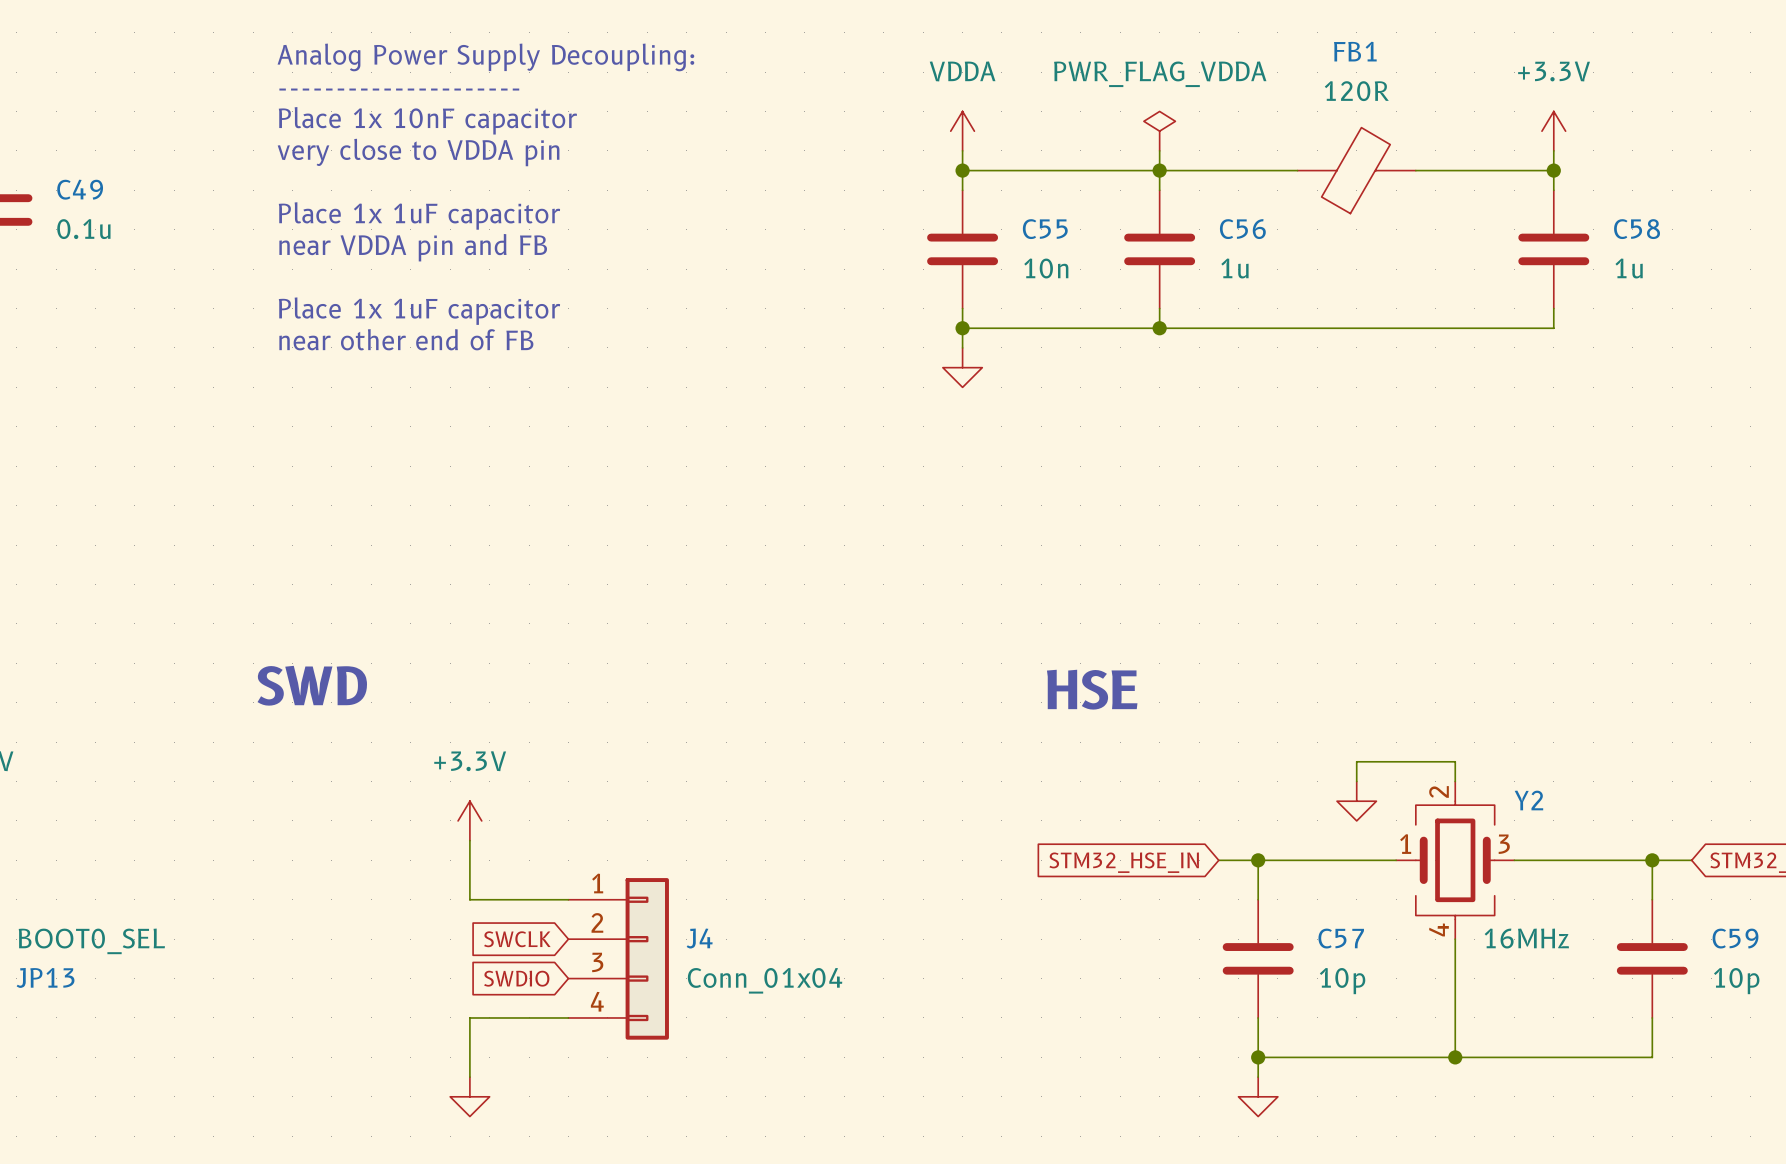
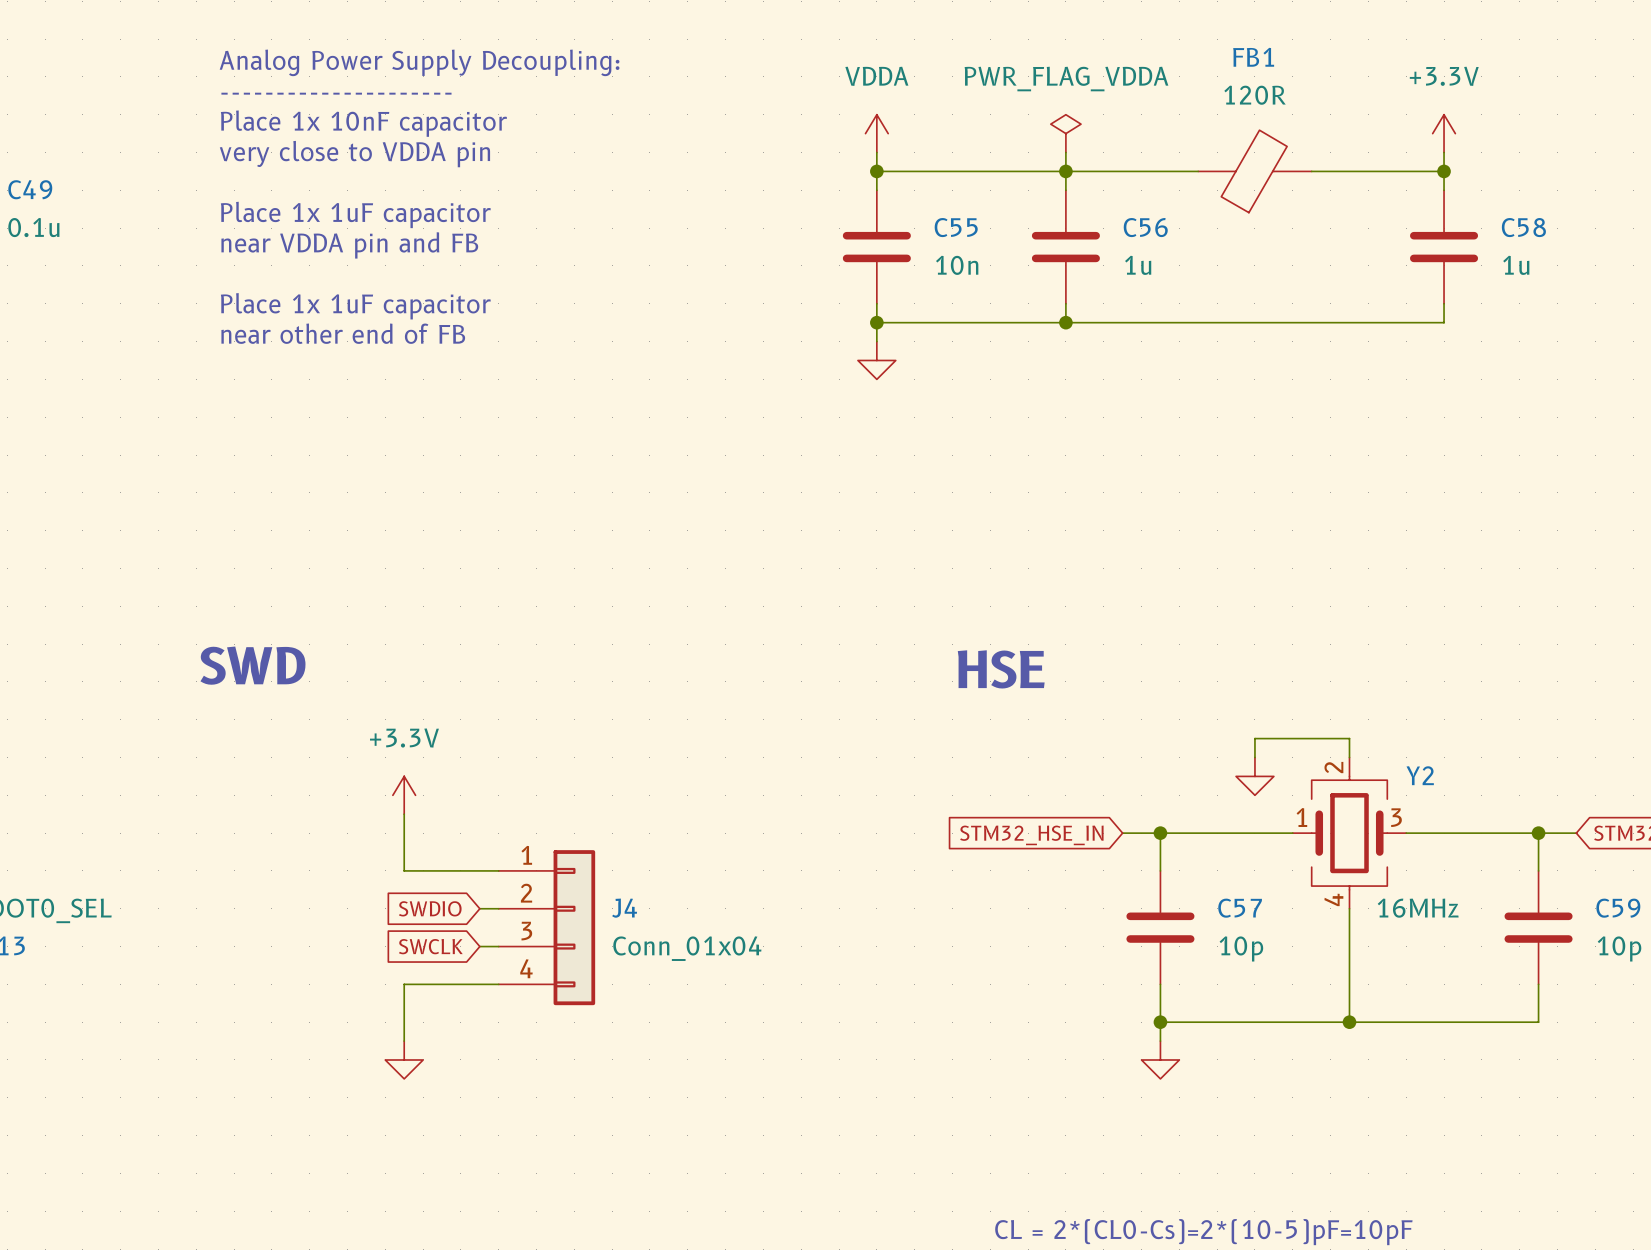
global label position: SWCLK (517, 939) -> SWCLK (430, 946)
wire: none -> (479, 908) (498, 908)
global label position: SWDIO (516, 978) -> SWDIO (430, 908)
wire: none -> (479, 946) (498, 946)

